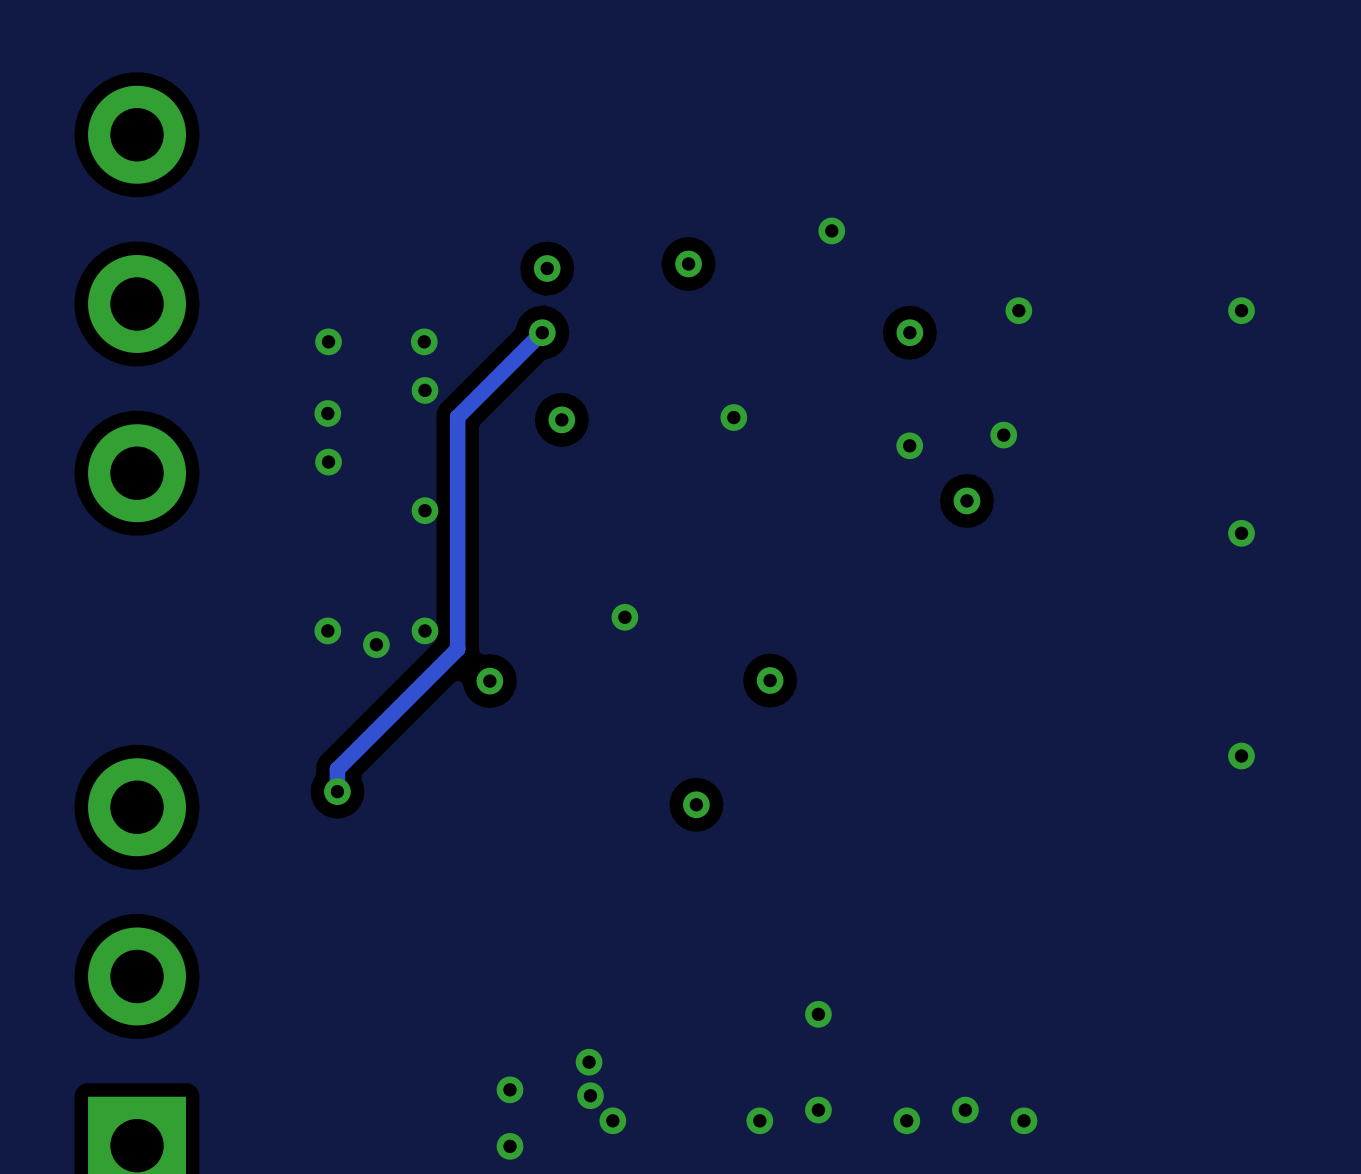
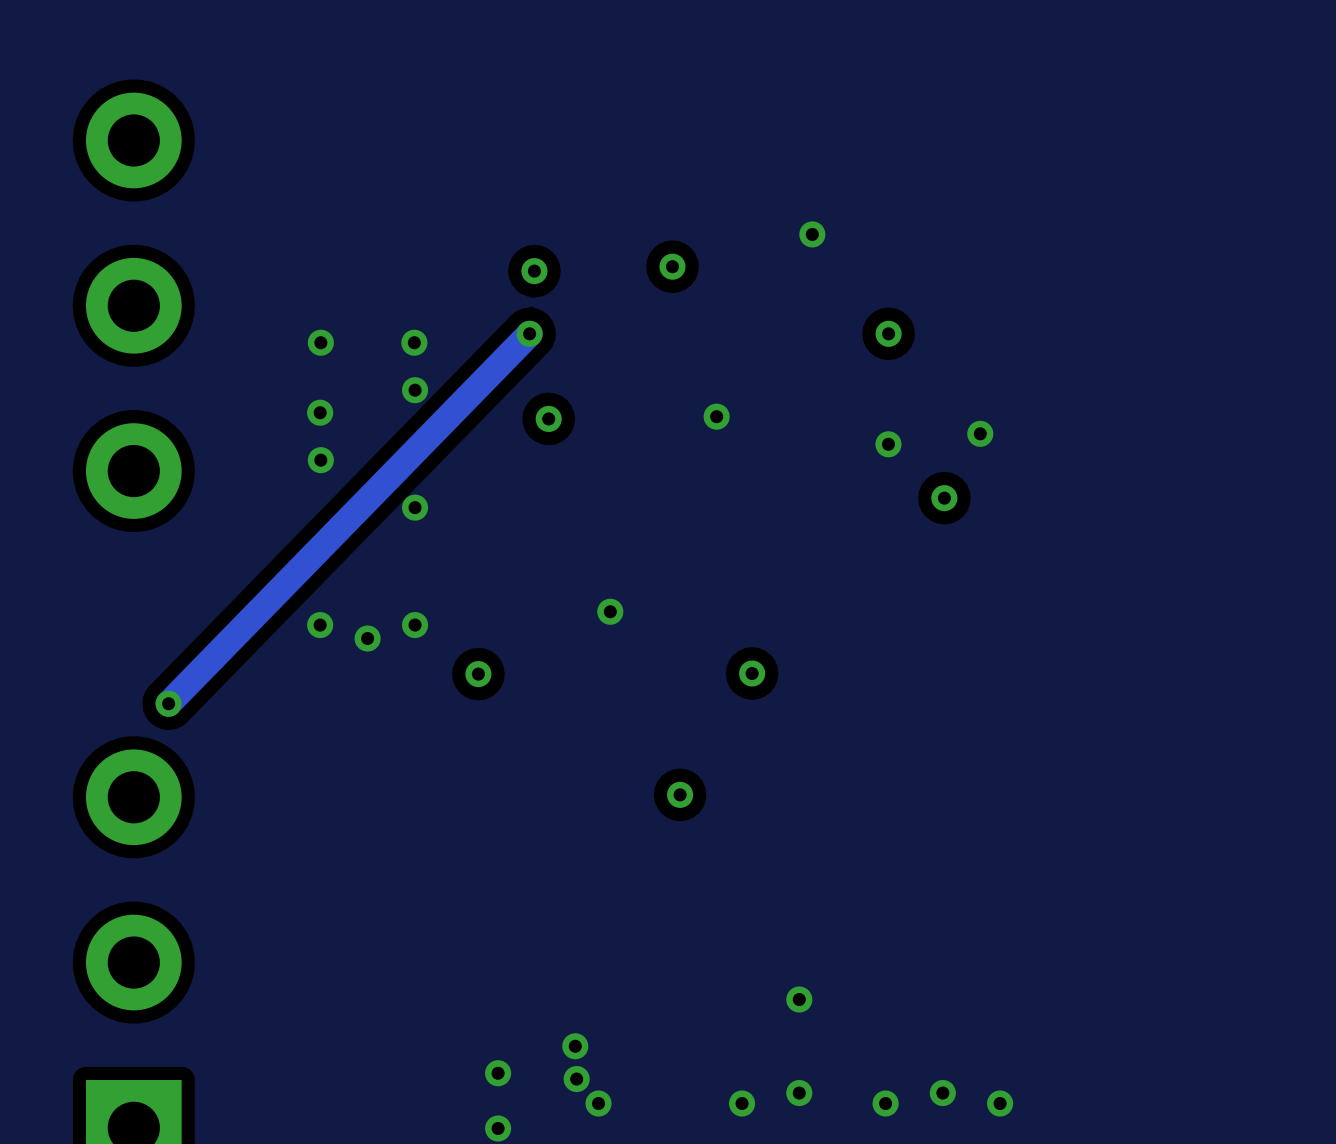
via: (1018, 310) -> none
via: (1241, 310) -> none
track: (542, 332) (457, 417) (457, 649) (337, 769) (337, 791) -> (529, 333) (168, 703)
via: (1241, 533) -> none
via: (1241, 756) -> none
via position: (337, 791) -> (168, 703)

